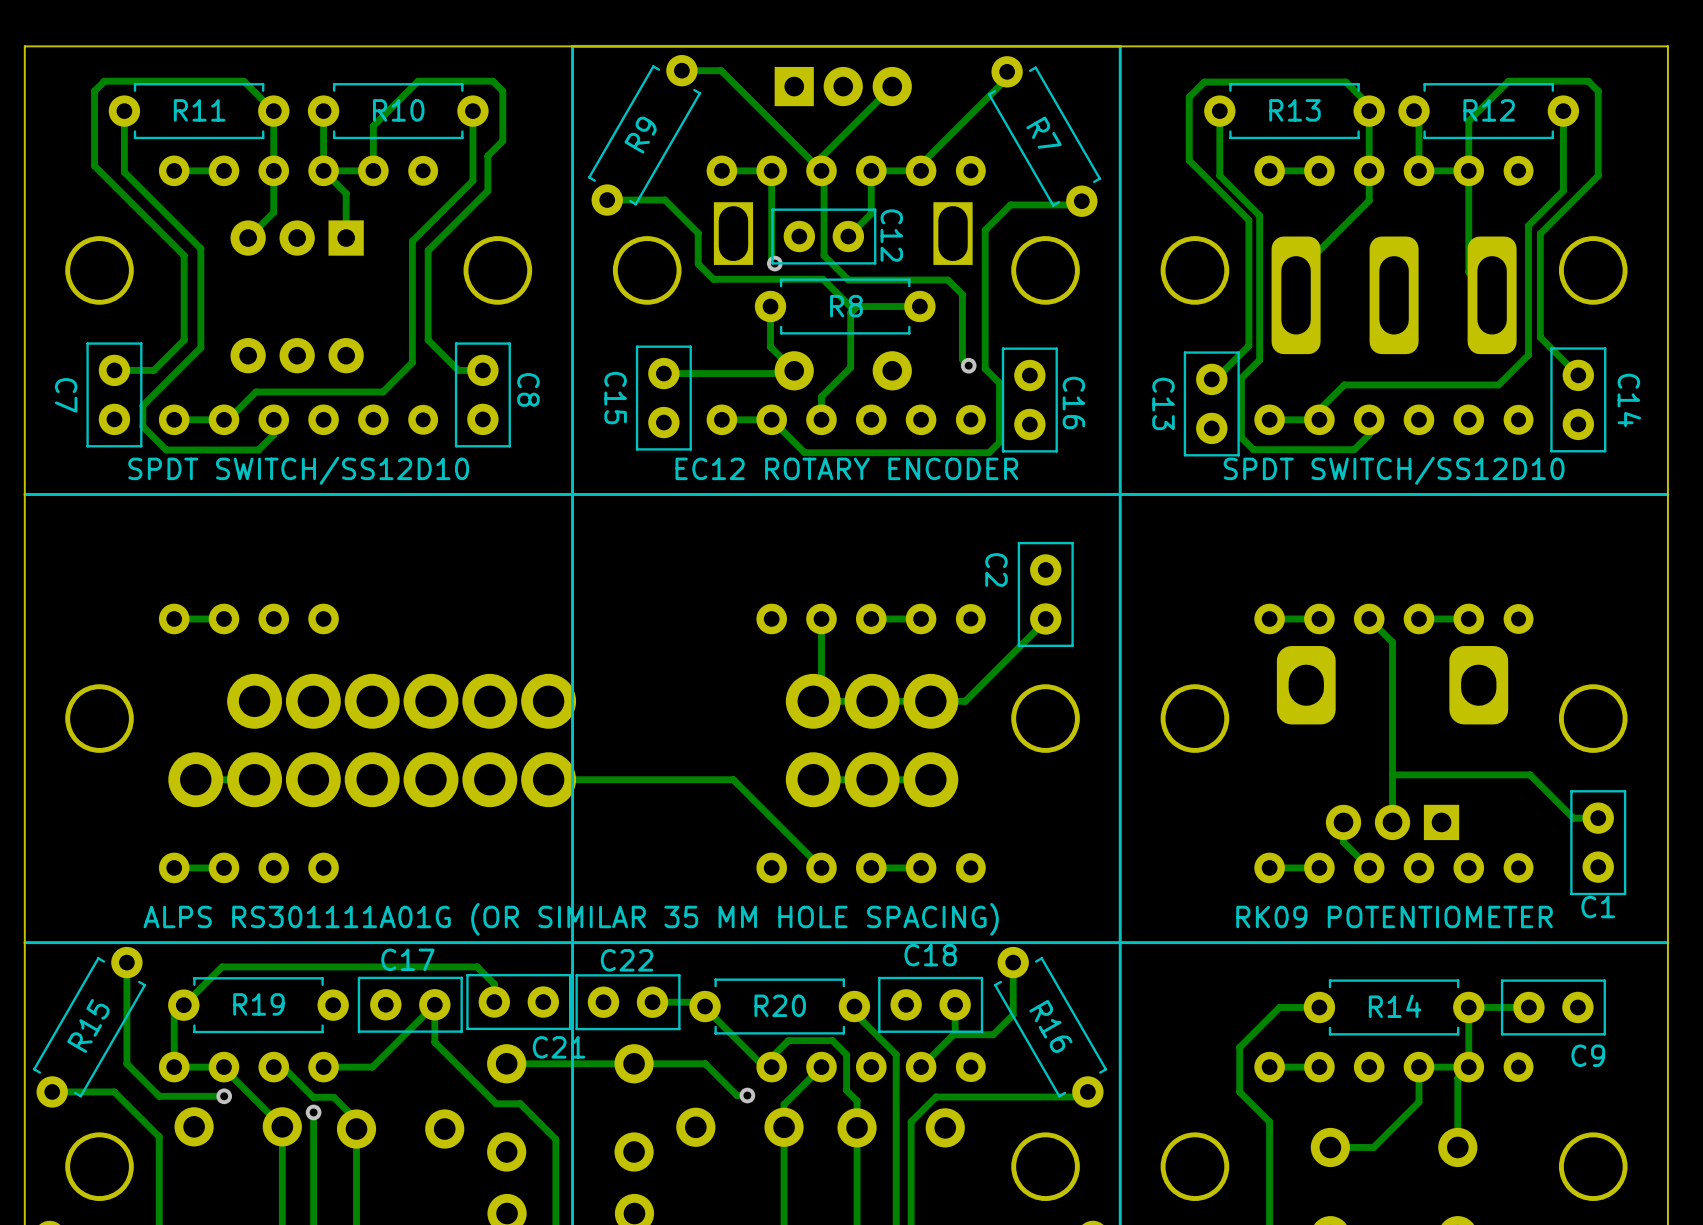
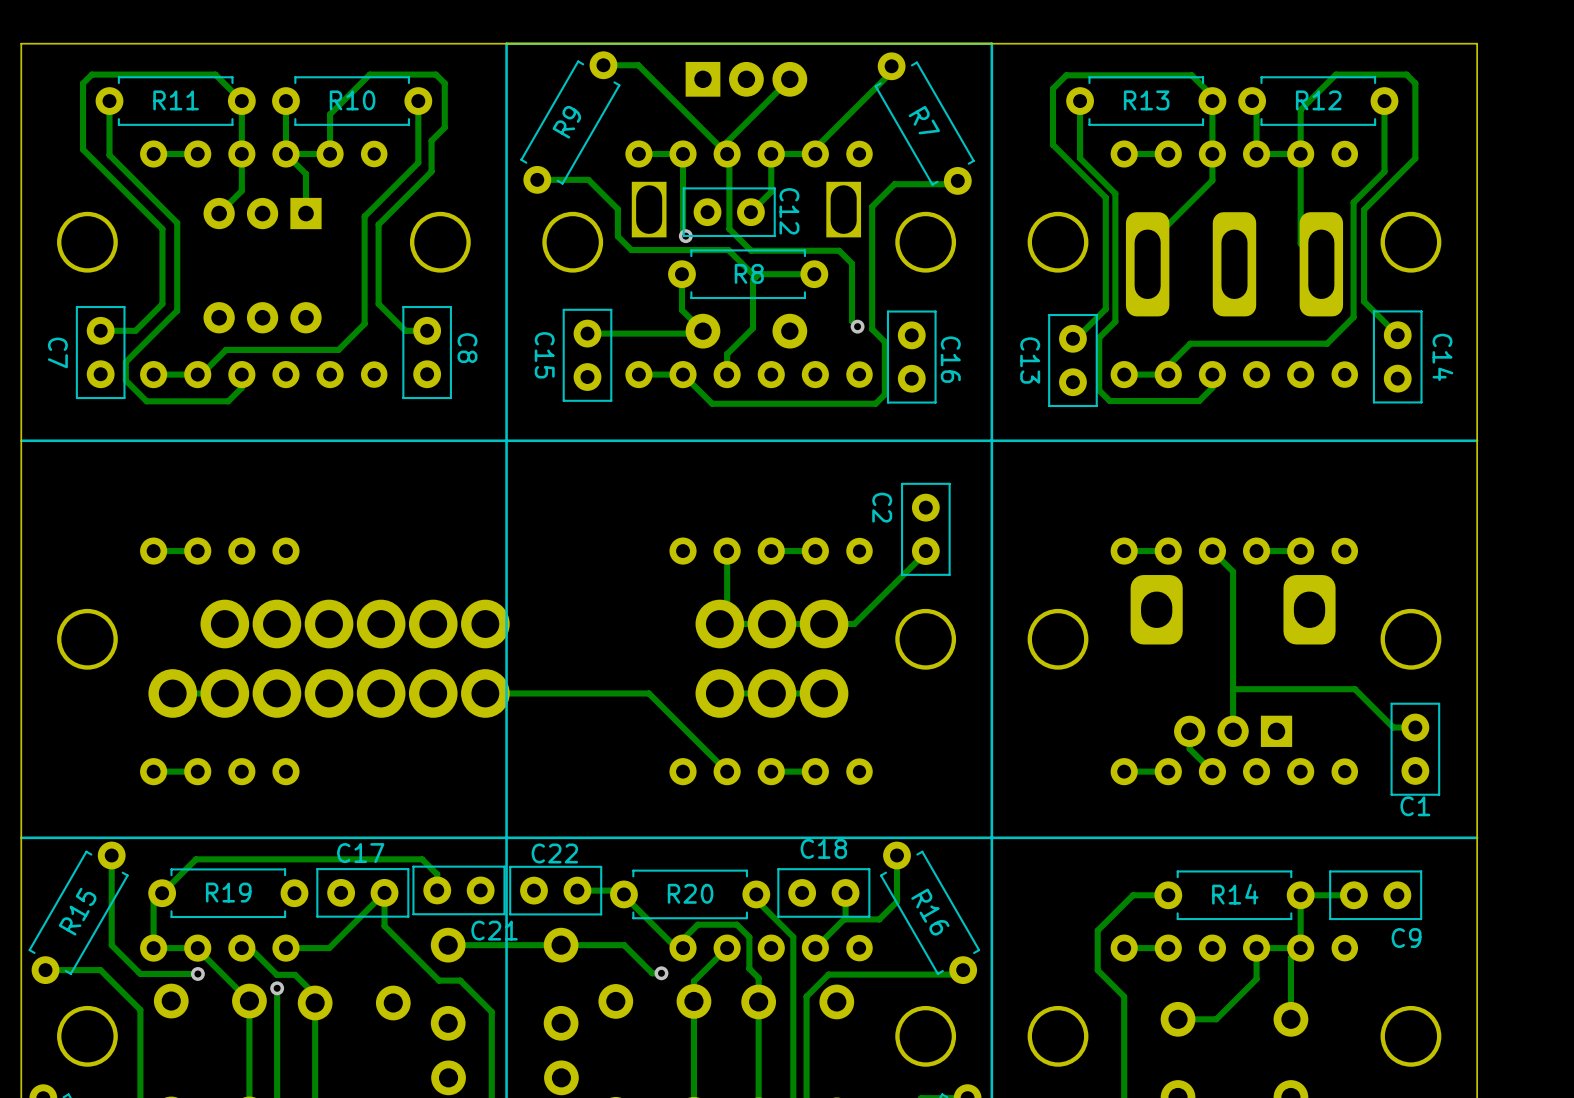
text: EC12 ROTARY ENCODER (846, 468) -> none
text: SPDT SWITCH/SS12D10 (298, 470) -> none
text: SPDT SWITCH/SS12D10 (1394, 470) -> none
text: RK09 POTENTIOMETER (1394, 916) -> none
text: ALPS RS301111A01G (OR SIMILAR 35 MM HOLE SPACING) (571, 919) -> none

